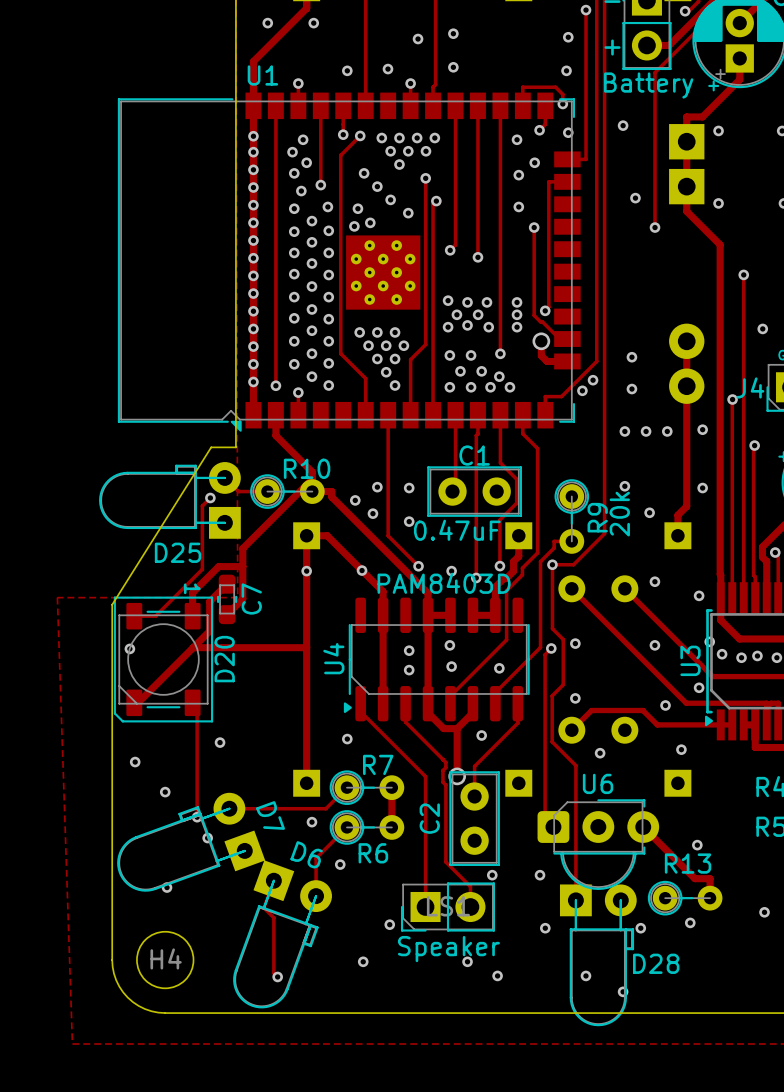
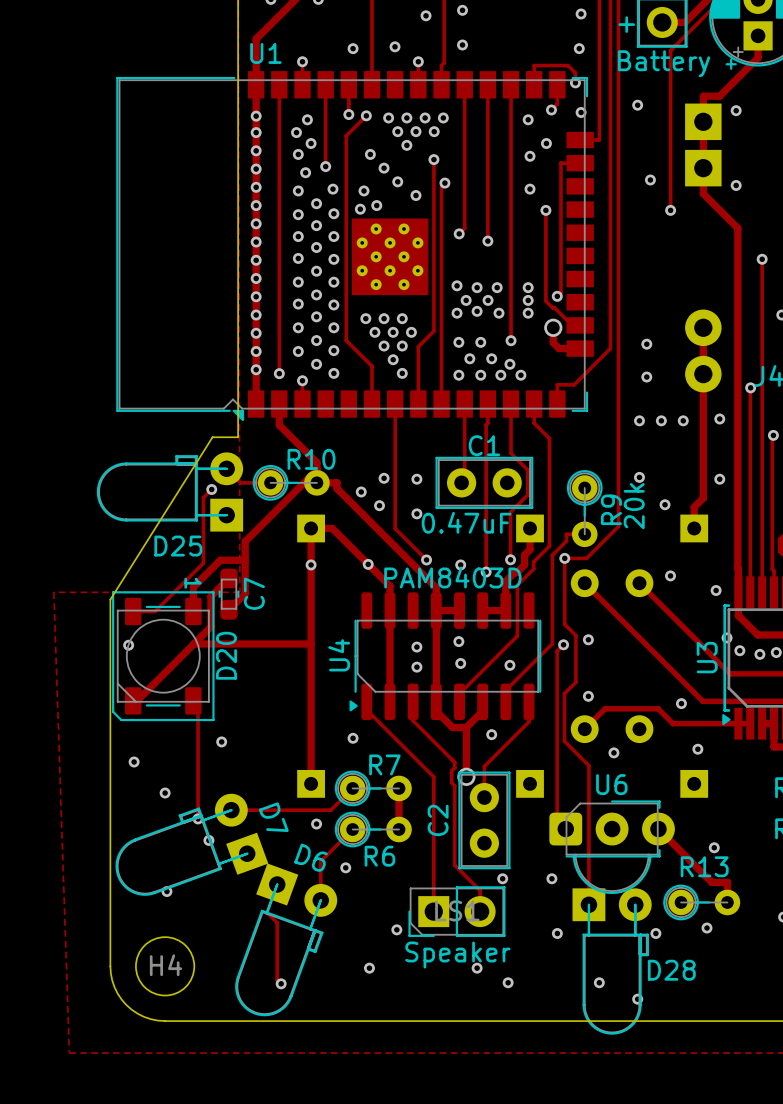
via: (593, 380) -> none
via: (582, 390) -> none
via: (654, 645) -> none
via: (699, 687) -> none

